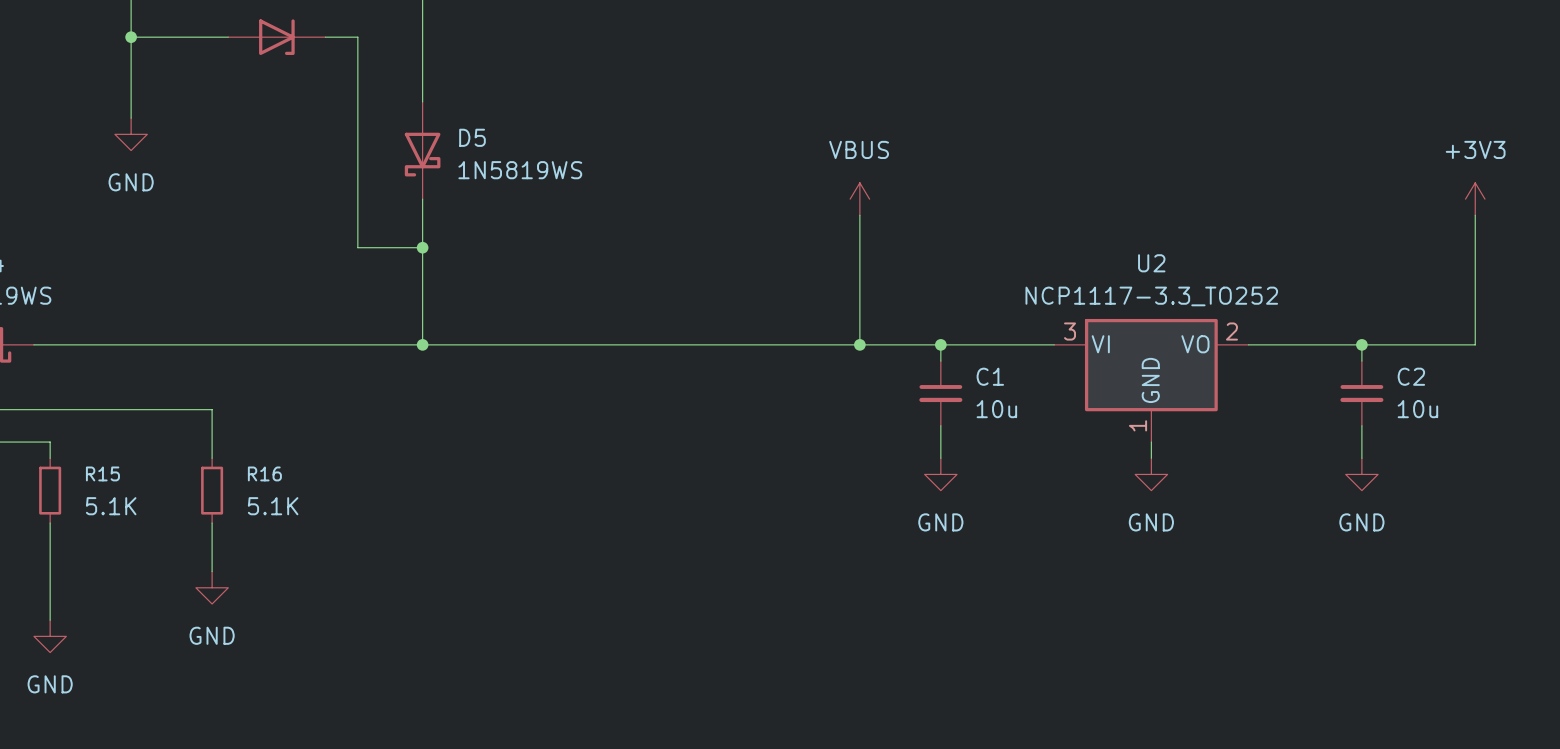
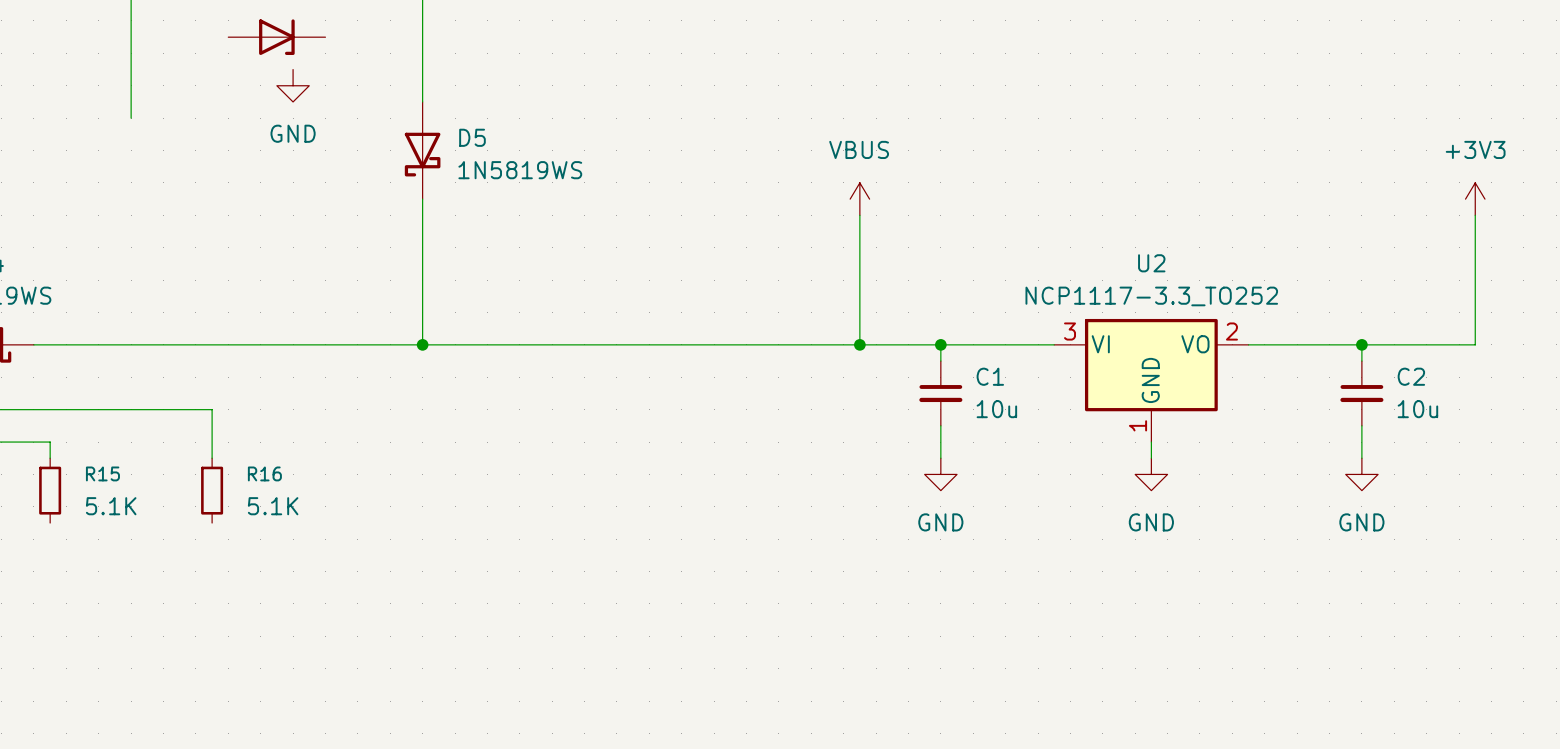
wire: (131, 37) (228, 37) -> none
junction: (131, 37) -> none
wire: (325, 37) (357, 37) (357, 247) (422, 247) -> none
power symbol position: GND (131, 134) -> GND (293, 85)
junction: (422, 247) -> none
wire: (50, 523) (50, 620) -> none
wire: (212, 523) (212, 571) -> none
power symbol: GND (212, 587) -> none
power symbol: GND (50, 636) -> none

